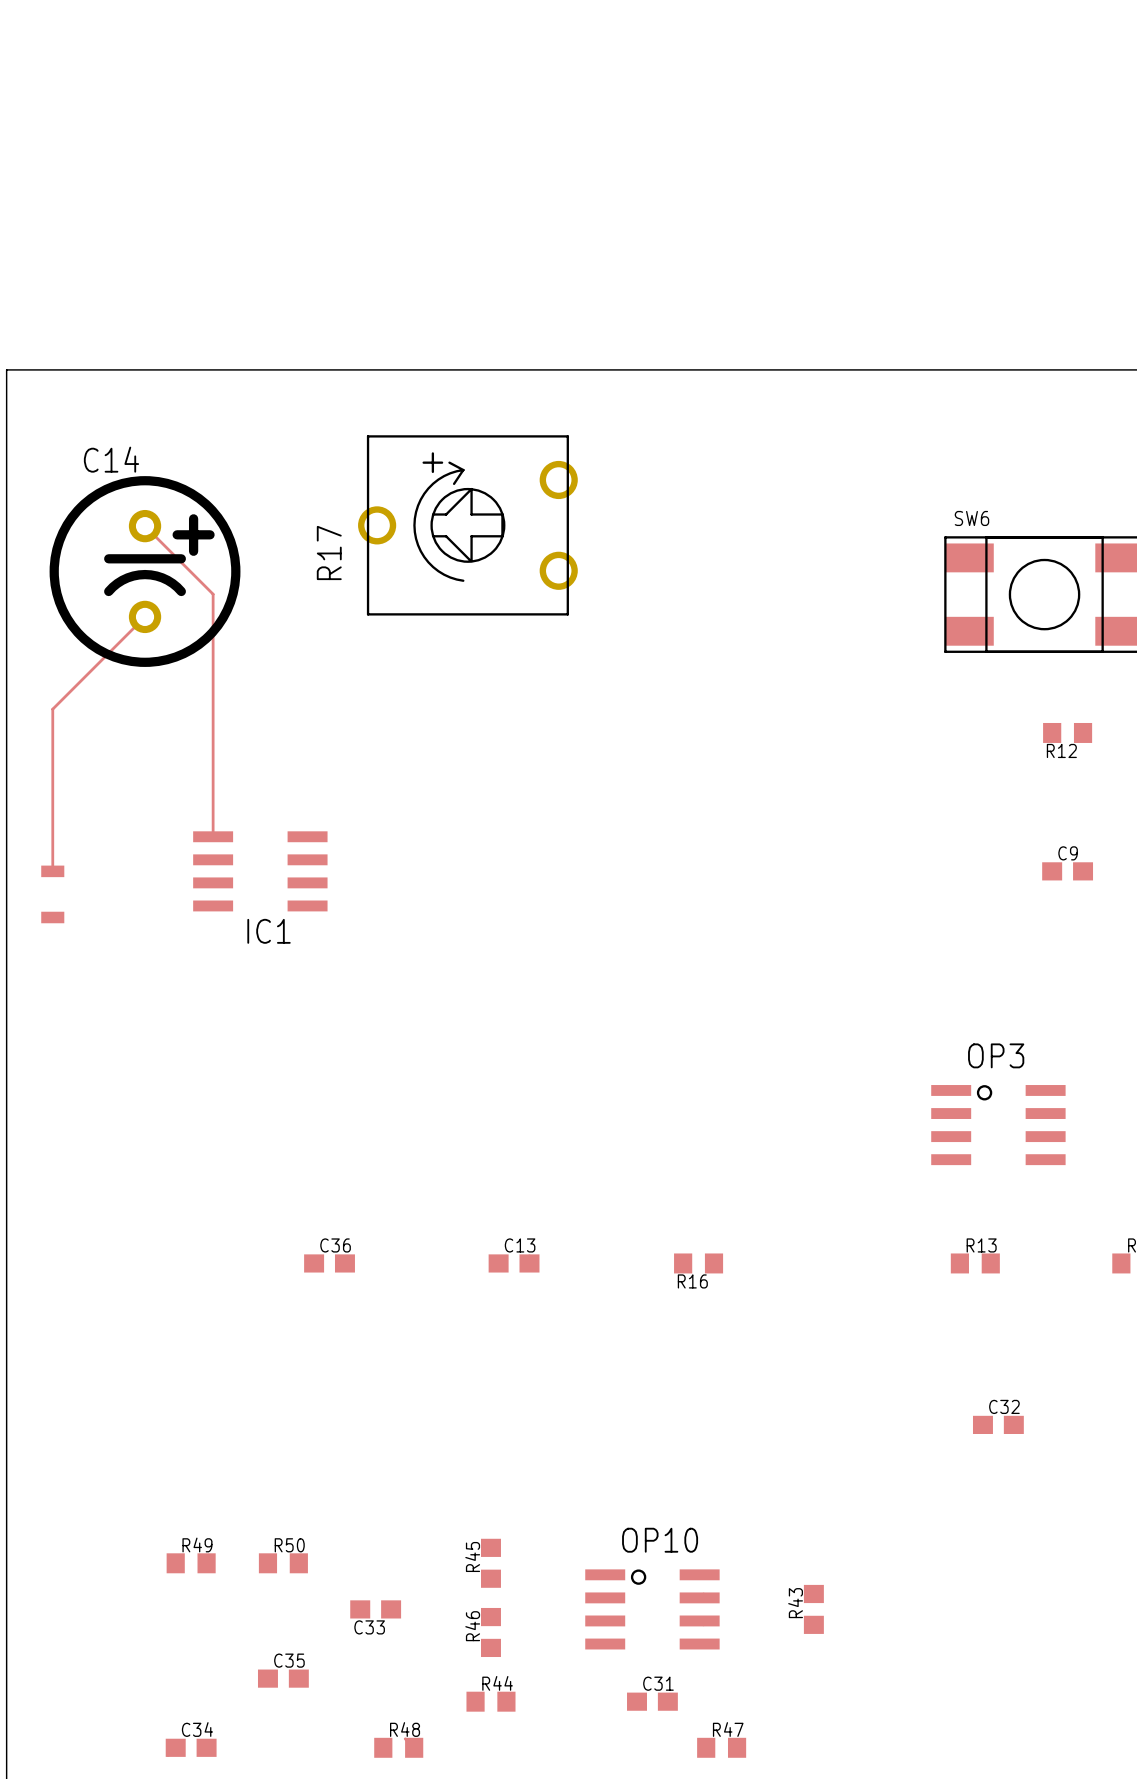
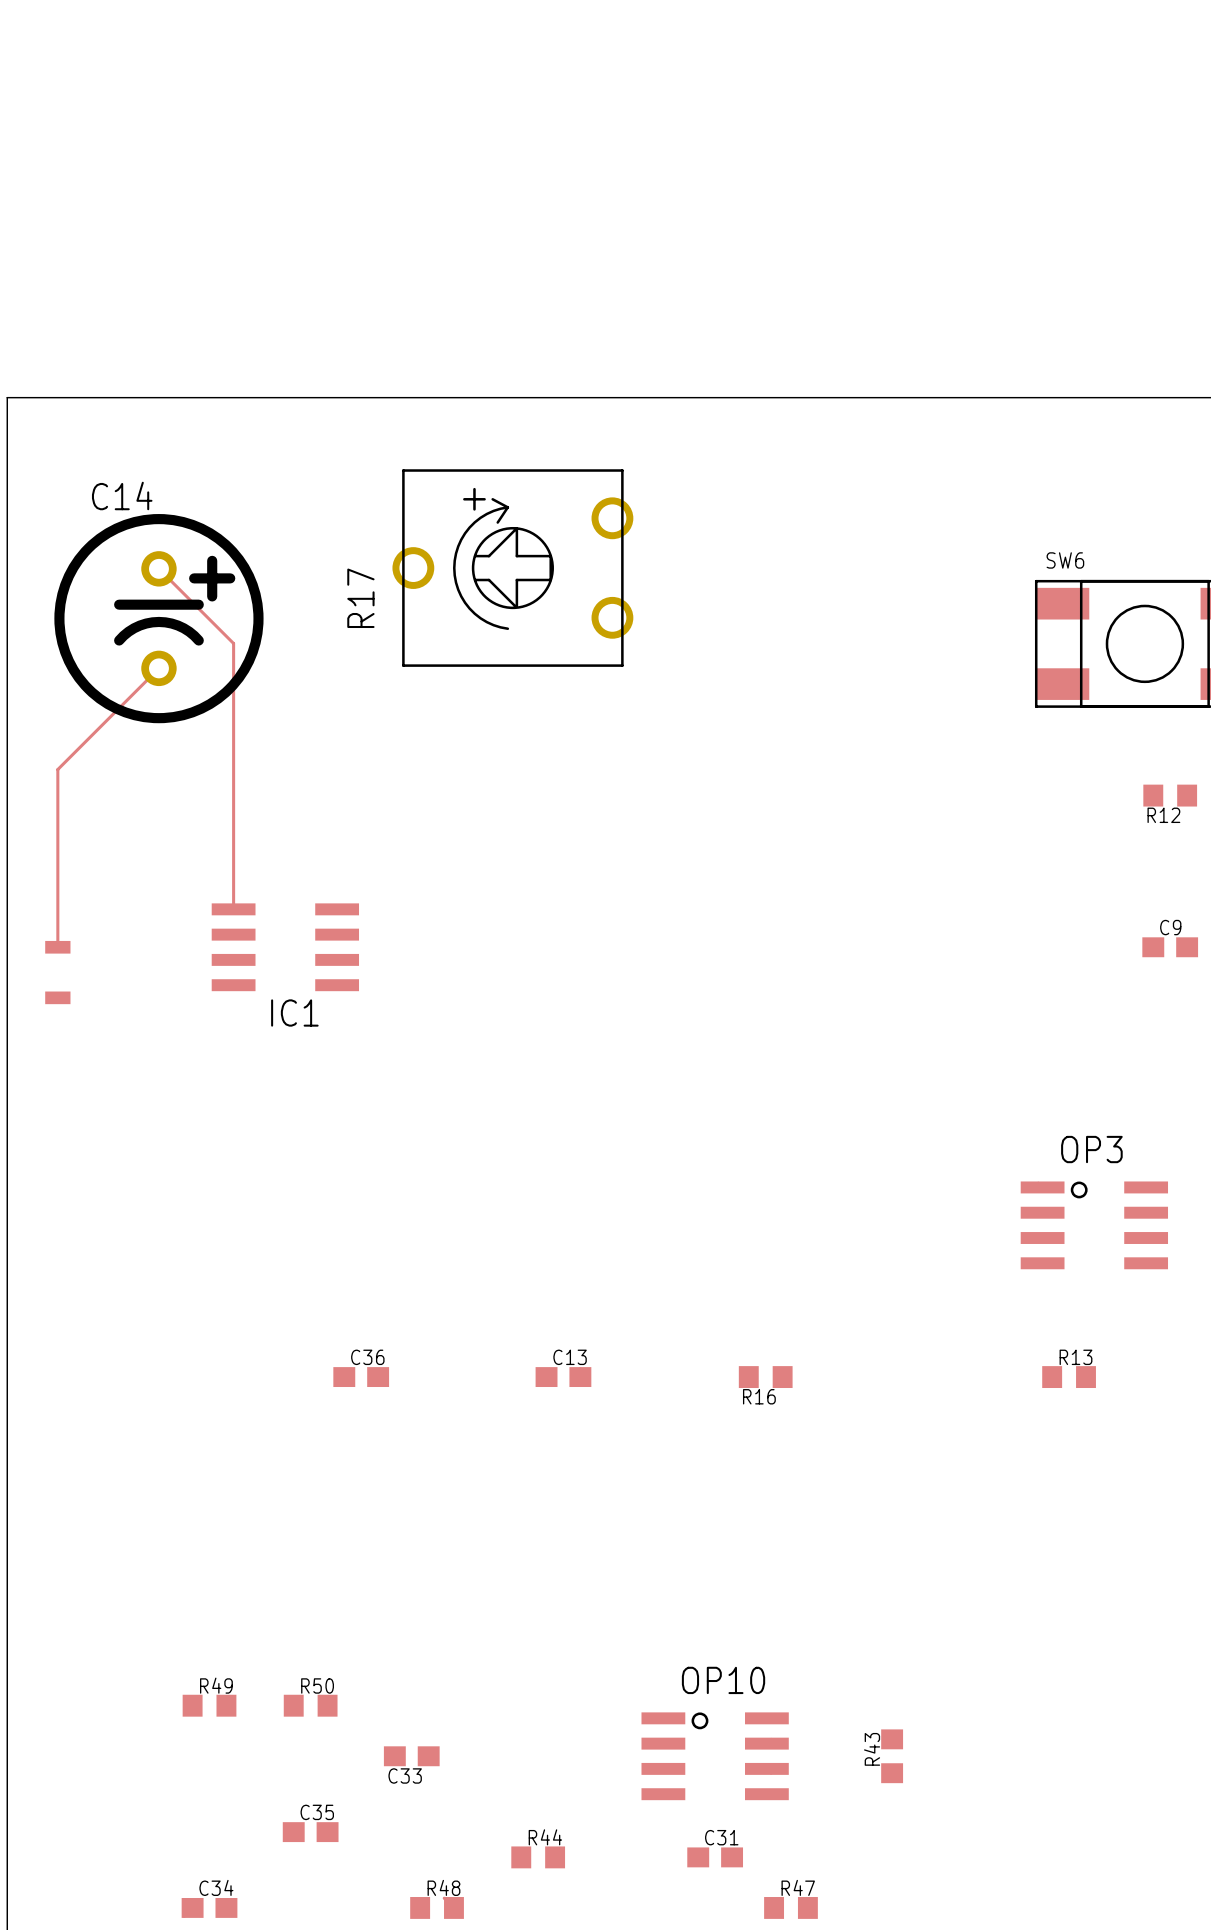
C32: (998, 1424) -> none
R45: (490, 1563) -> none
R46: (490, 1632) -> none

